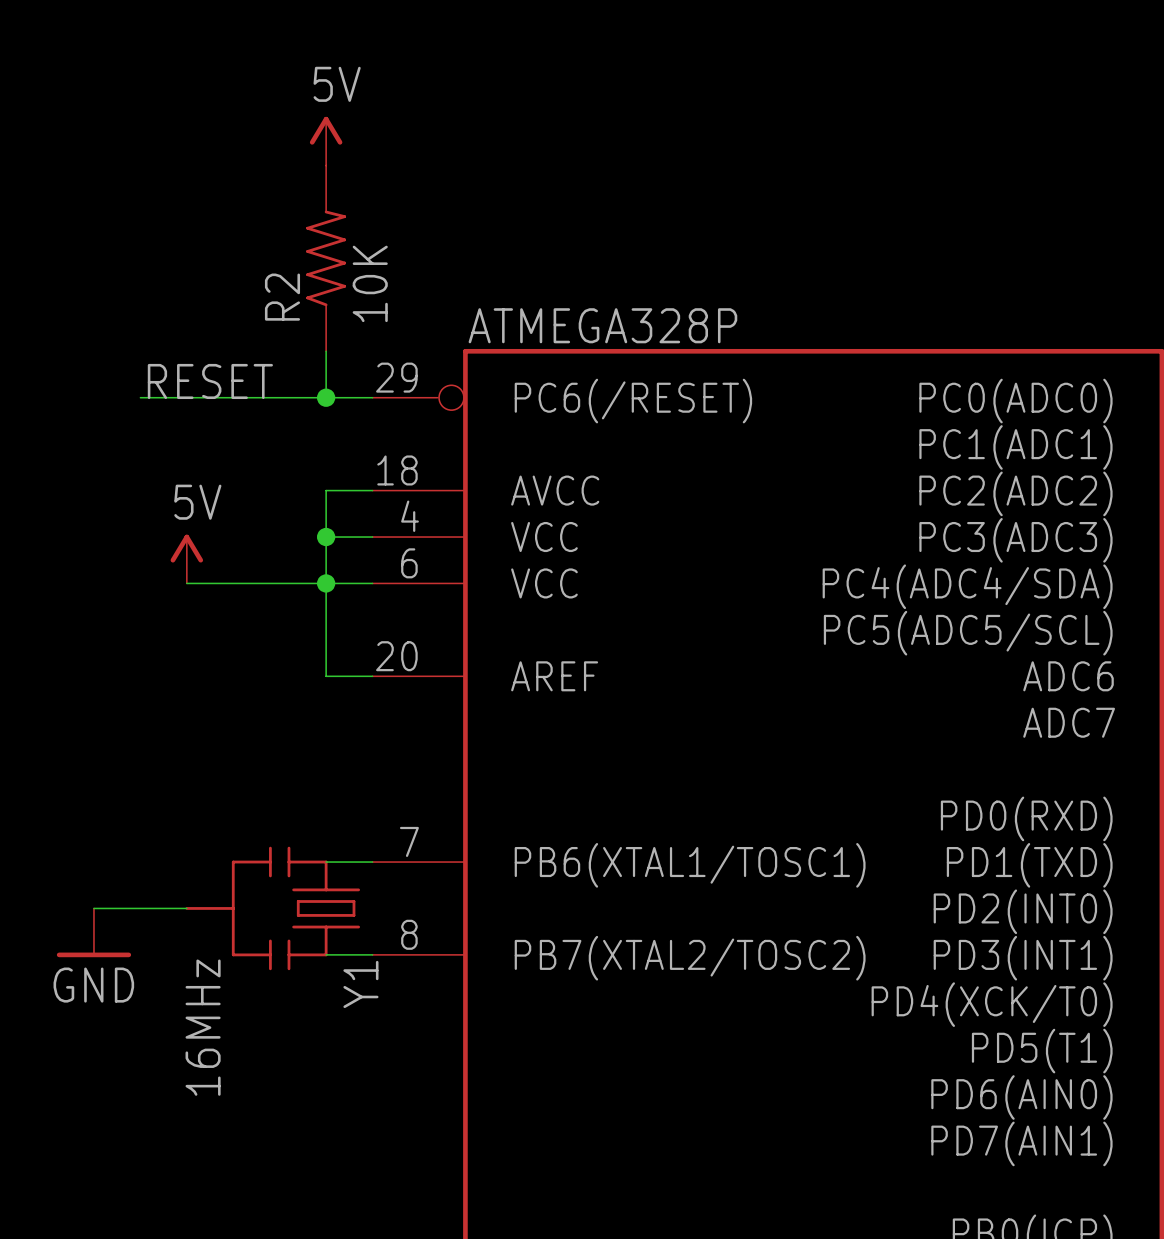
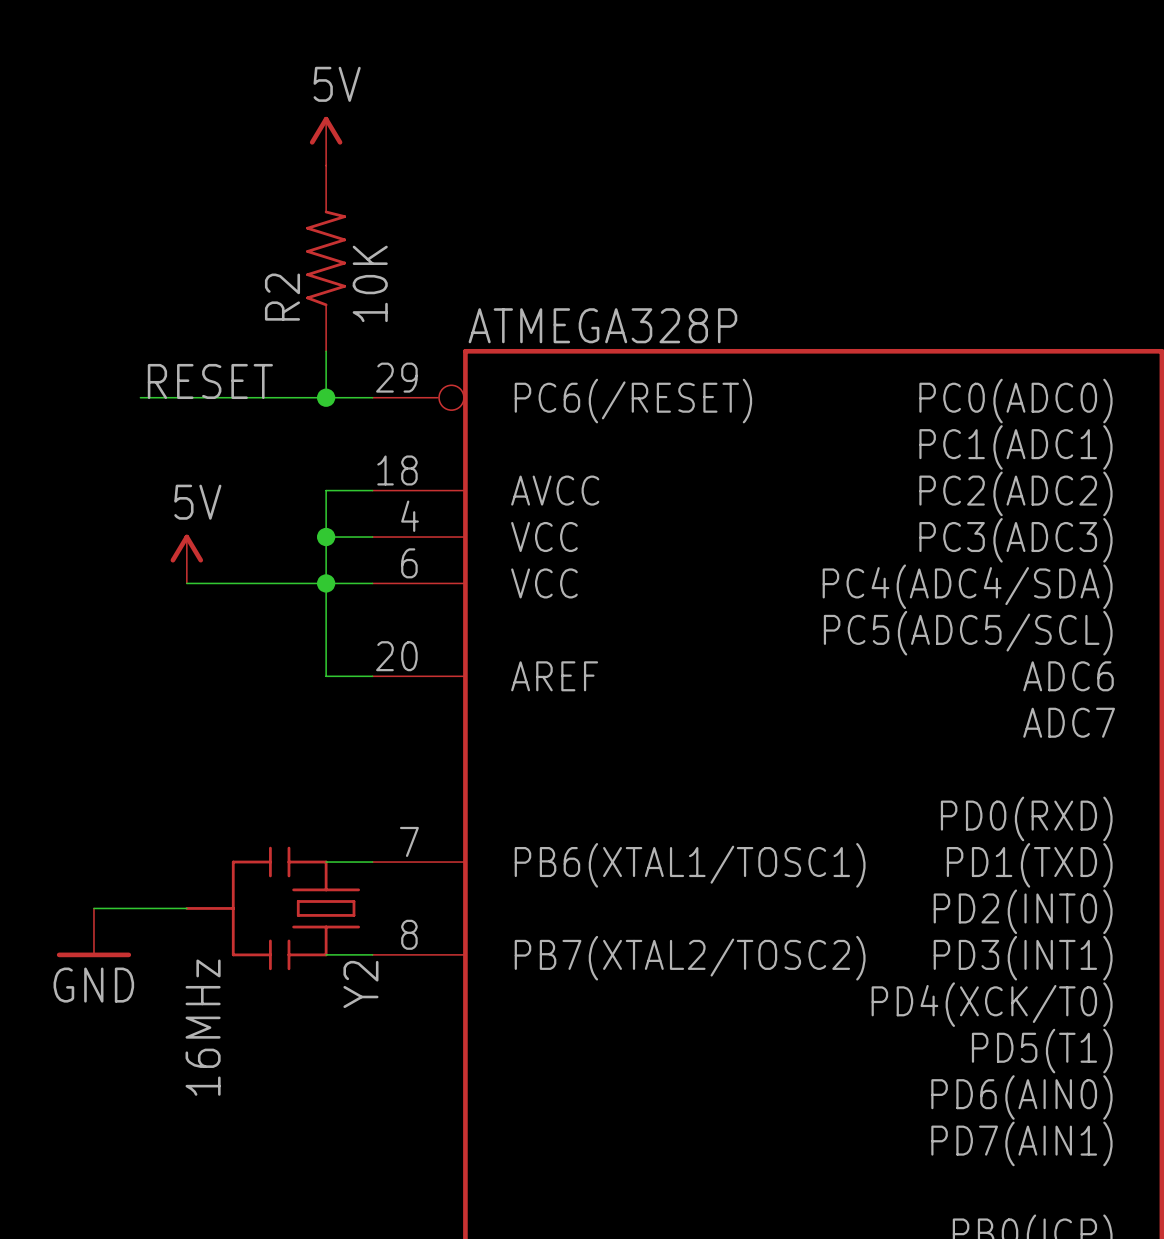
Y1 name: Y1 (360, 984) -> Y2 (360, 984)

